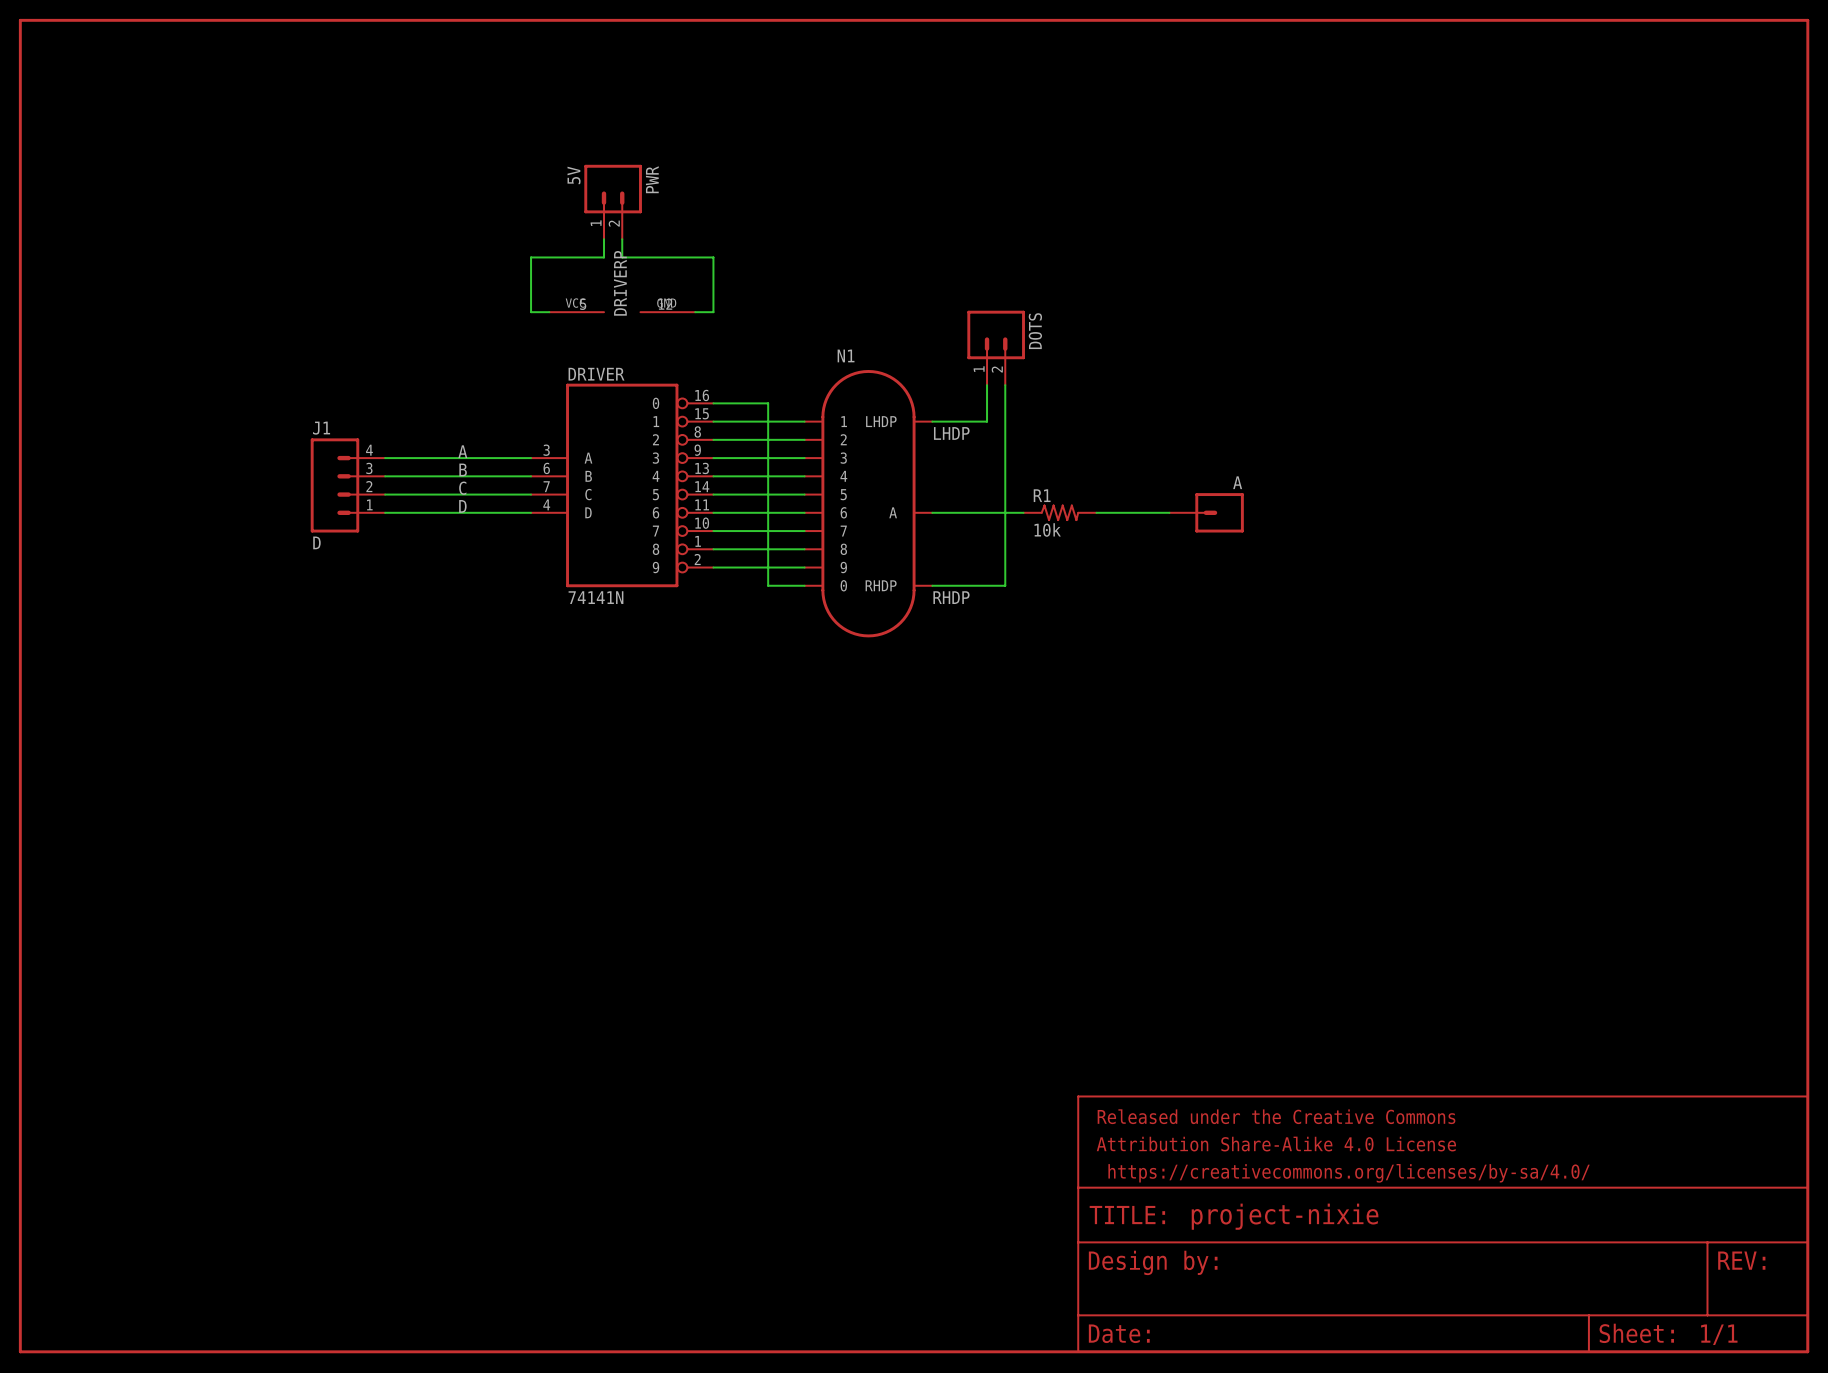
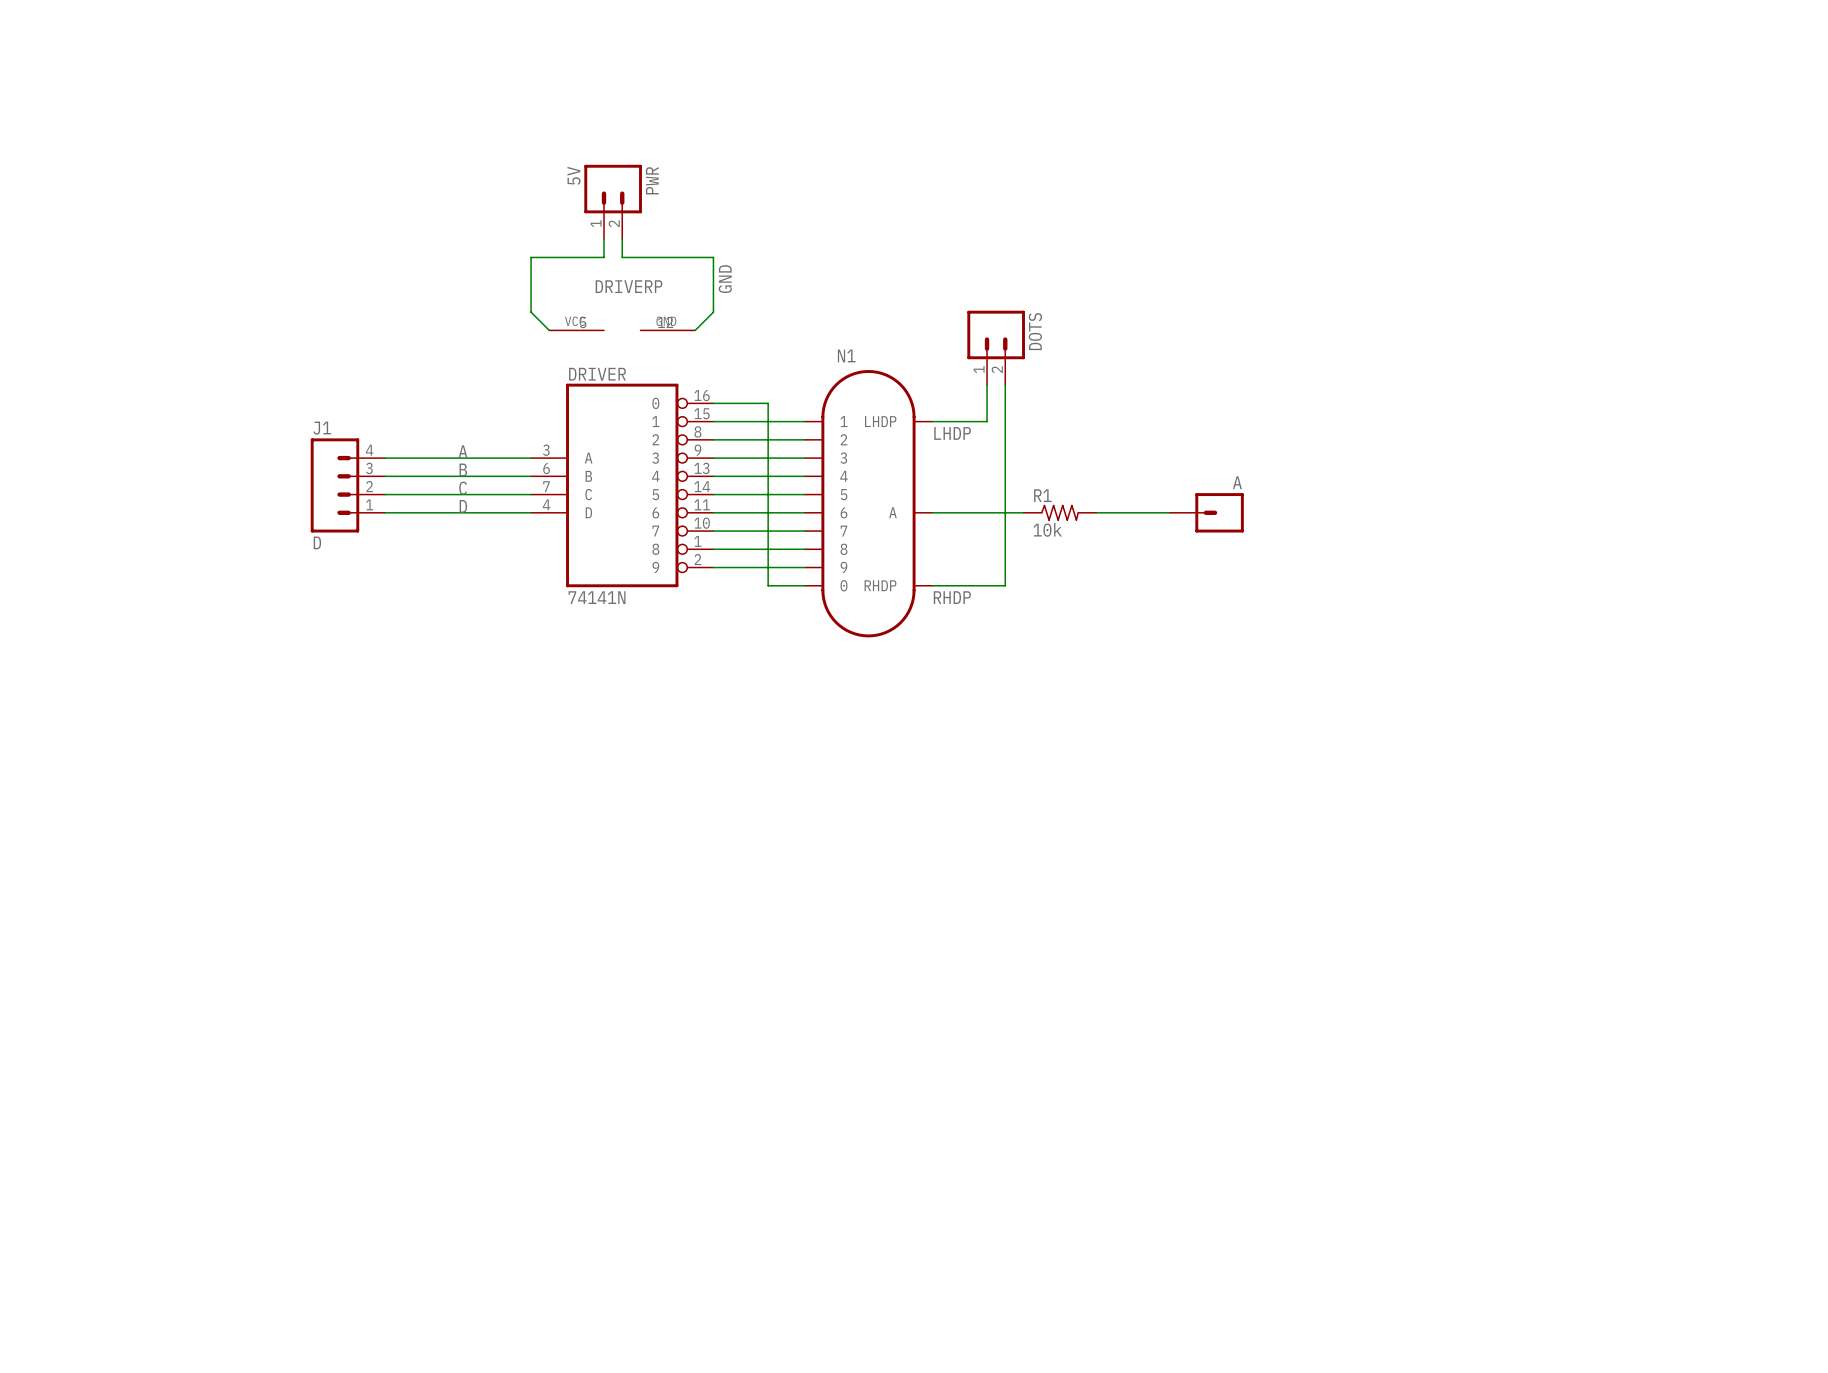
label: none -> GND (725, 279)
DRIVERP name rotation: 0° (620, 283) -> 90° clockwise (629, 286)
wire: (531, 312) (549, 312) -> (531, 312) (549, 330)
DRIVERP position: (622, 312) -> (622, 330)
wire: (695, 312) (713, 312) -> (695, 330) (713, 312)
part: (914, 686) -> none
part: (1443, 1224) -> none

